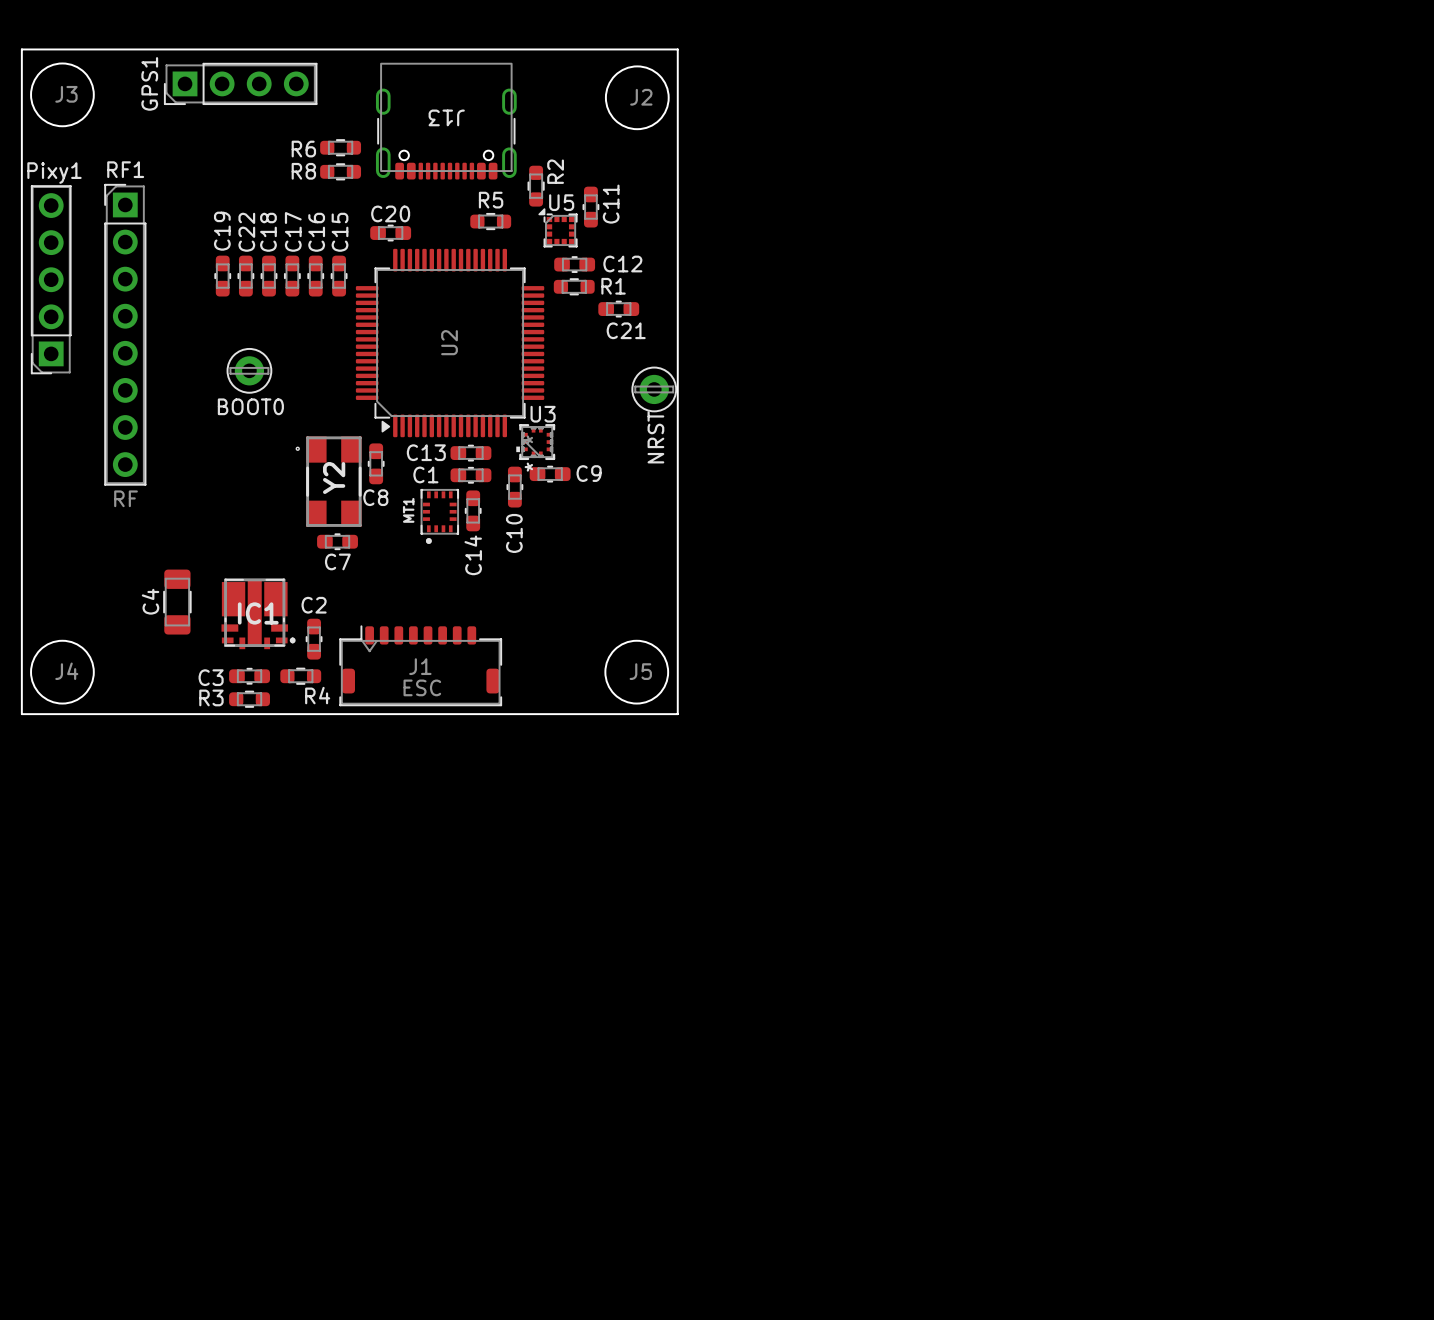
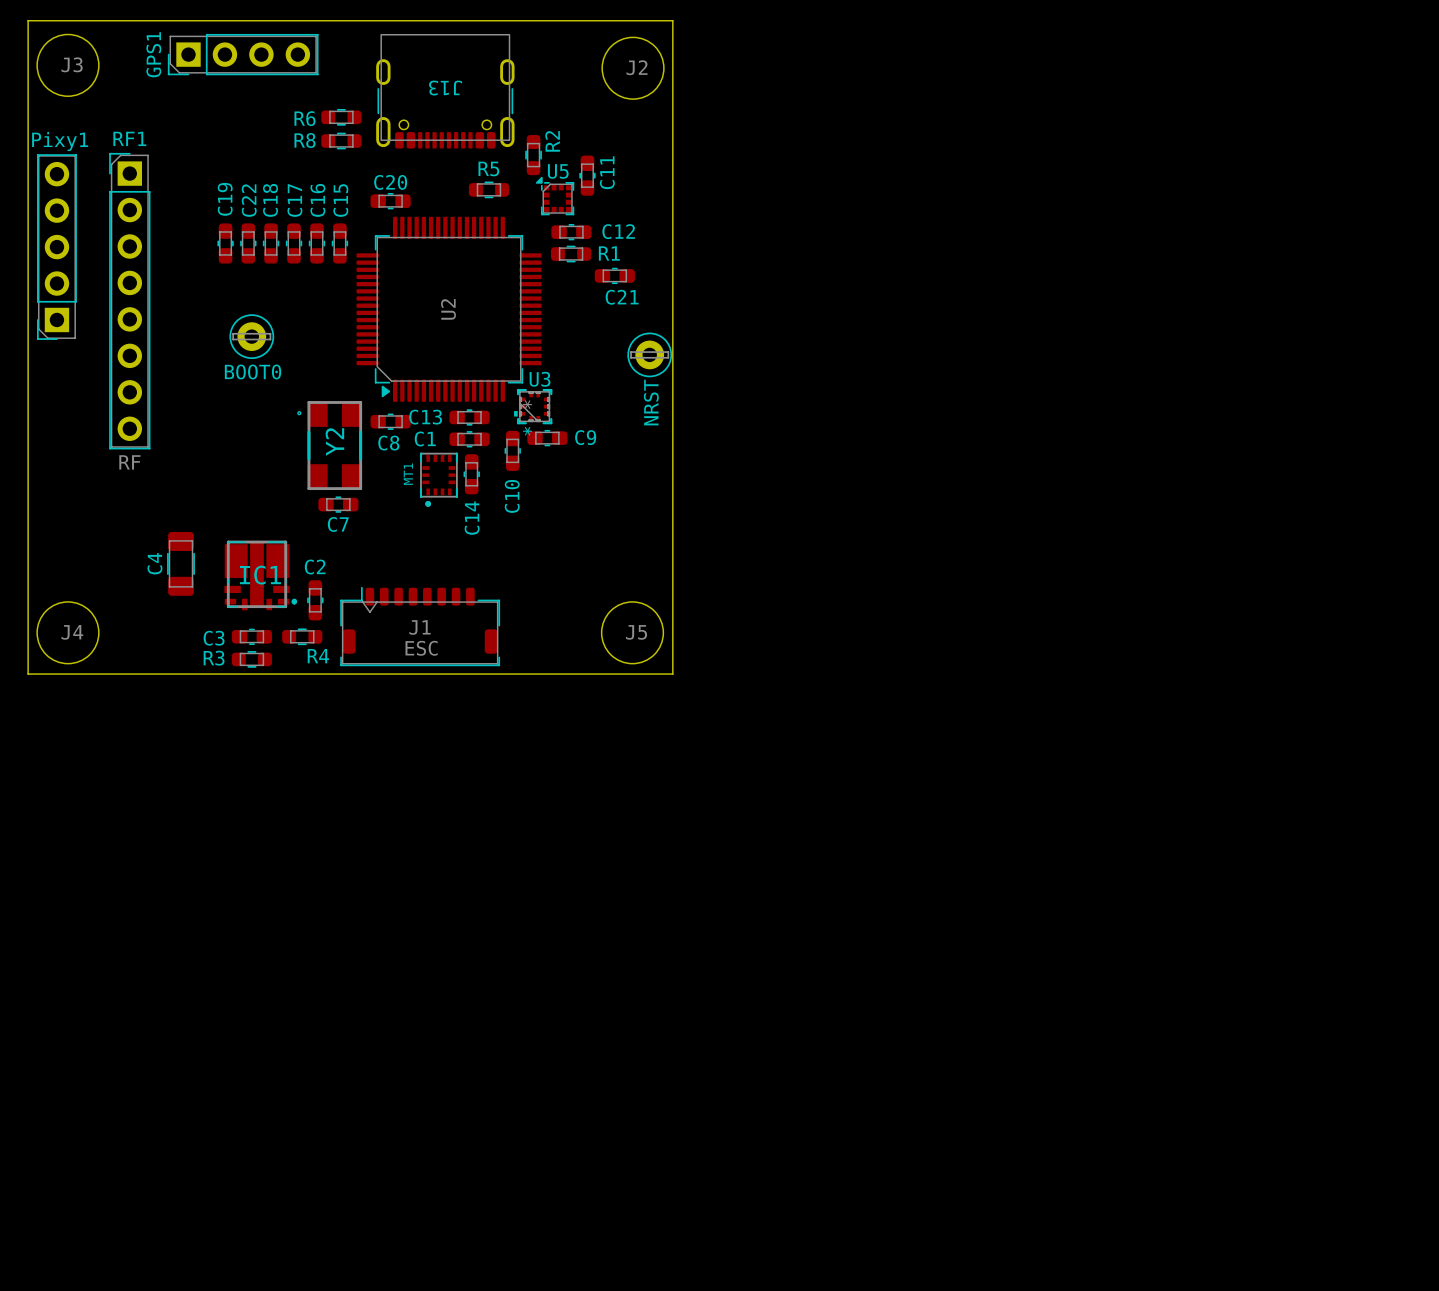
C8 rotation: 0° (376, 463) -> 90° clockwise (390, 421)

